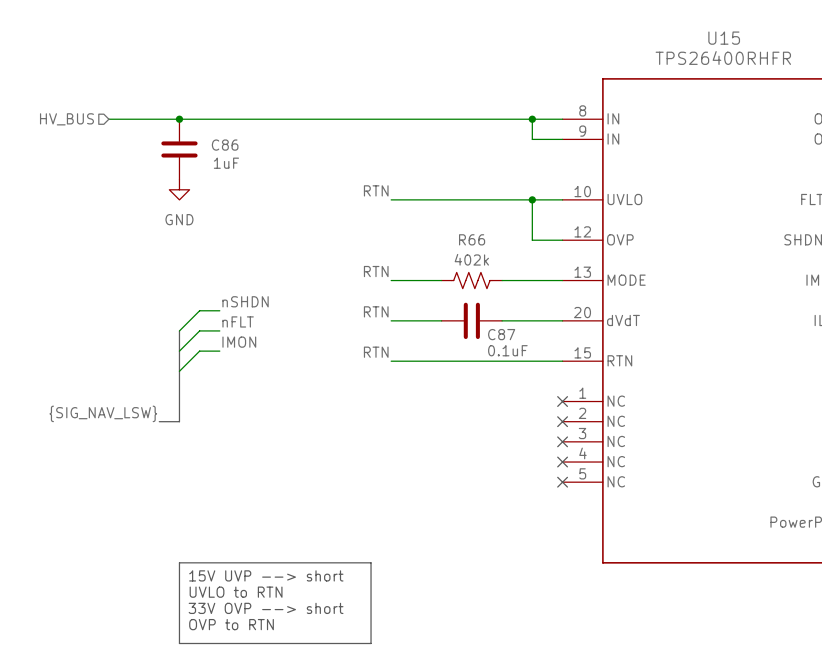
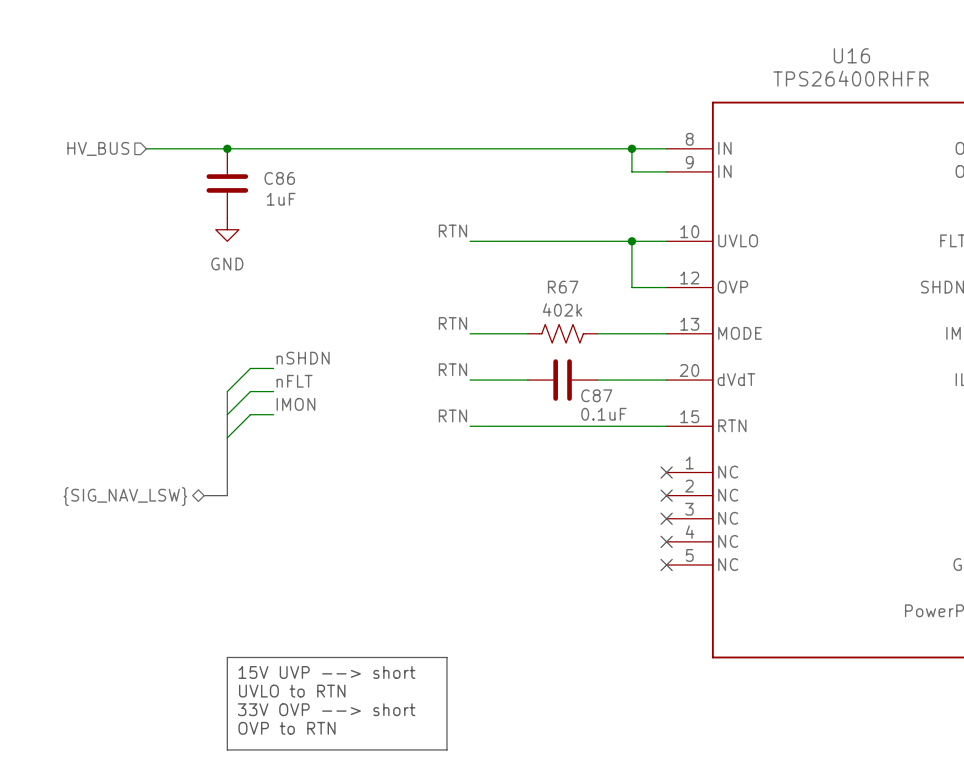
U15 name: U15 (724, 38) -> U16 (851, 55)
R66 name: R66 (472, 239) -> R67 (563, 287)
label: {SIG_NAV_LSW} (103, 413) -> none
hierarchical label: none -> {SIG_NAV_LSW} (125, 496)

